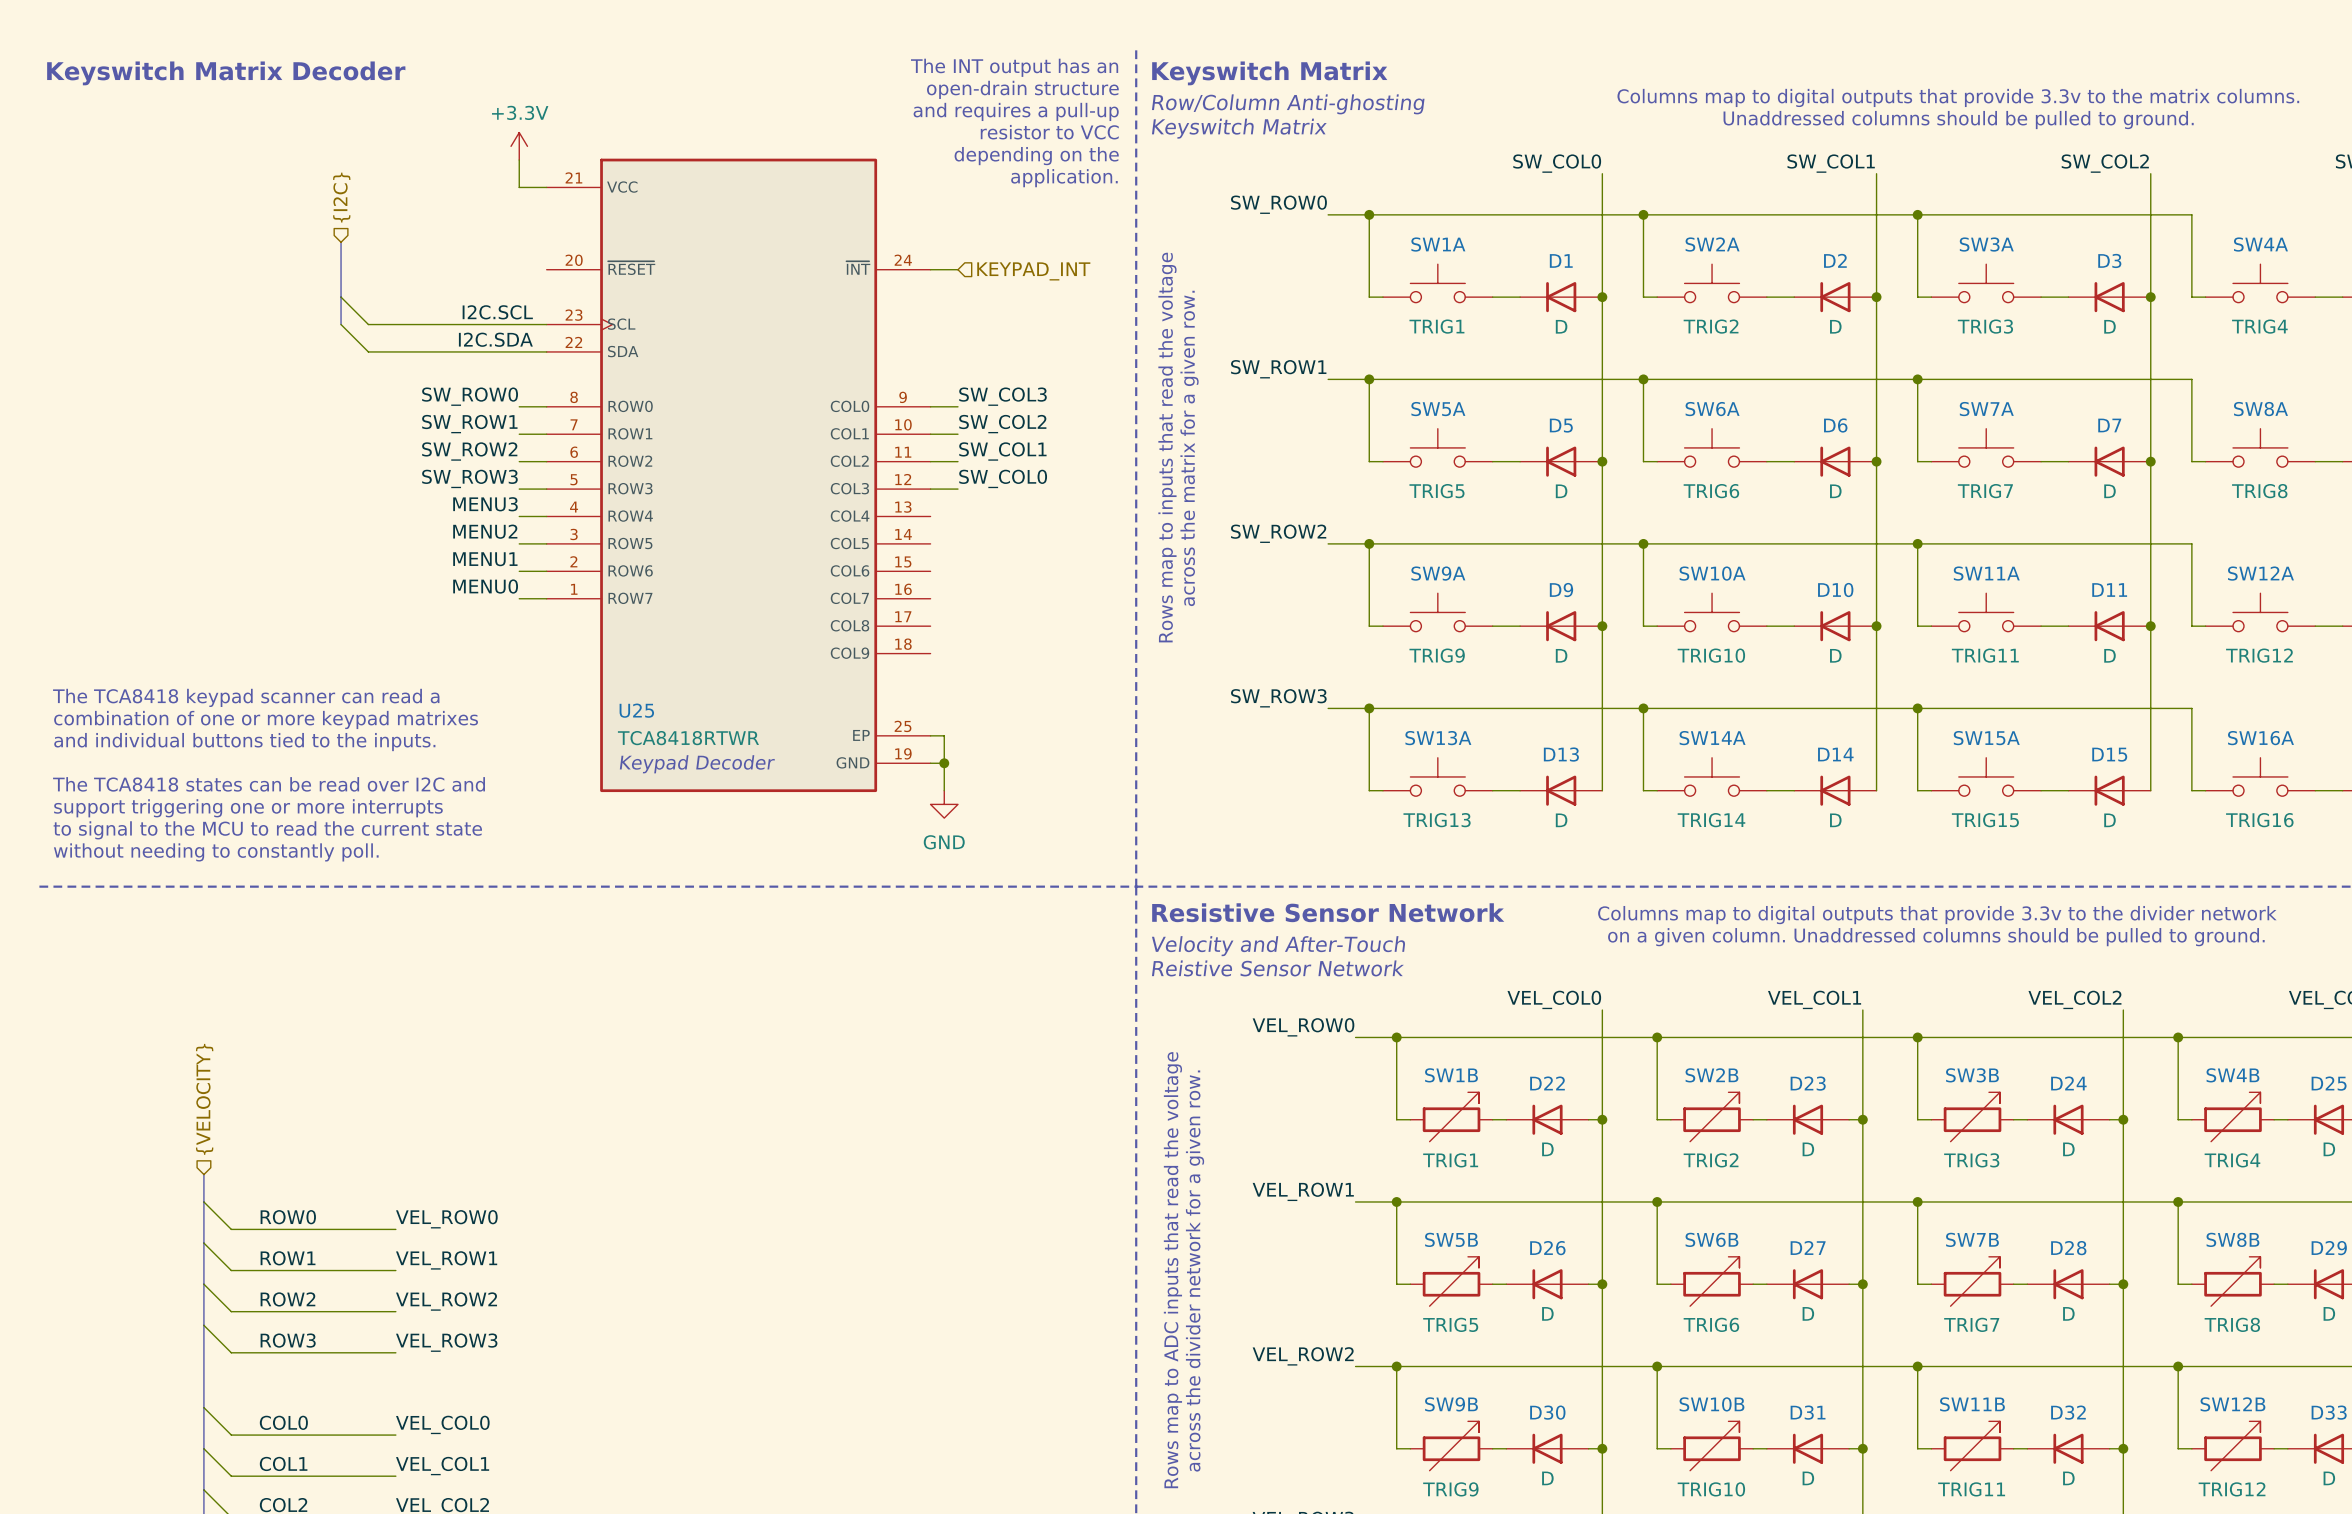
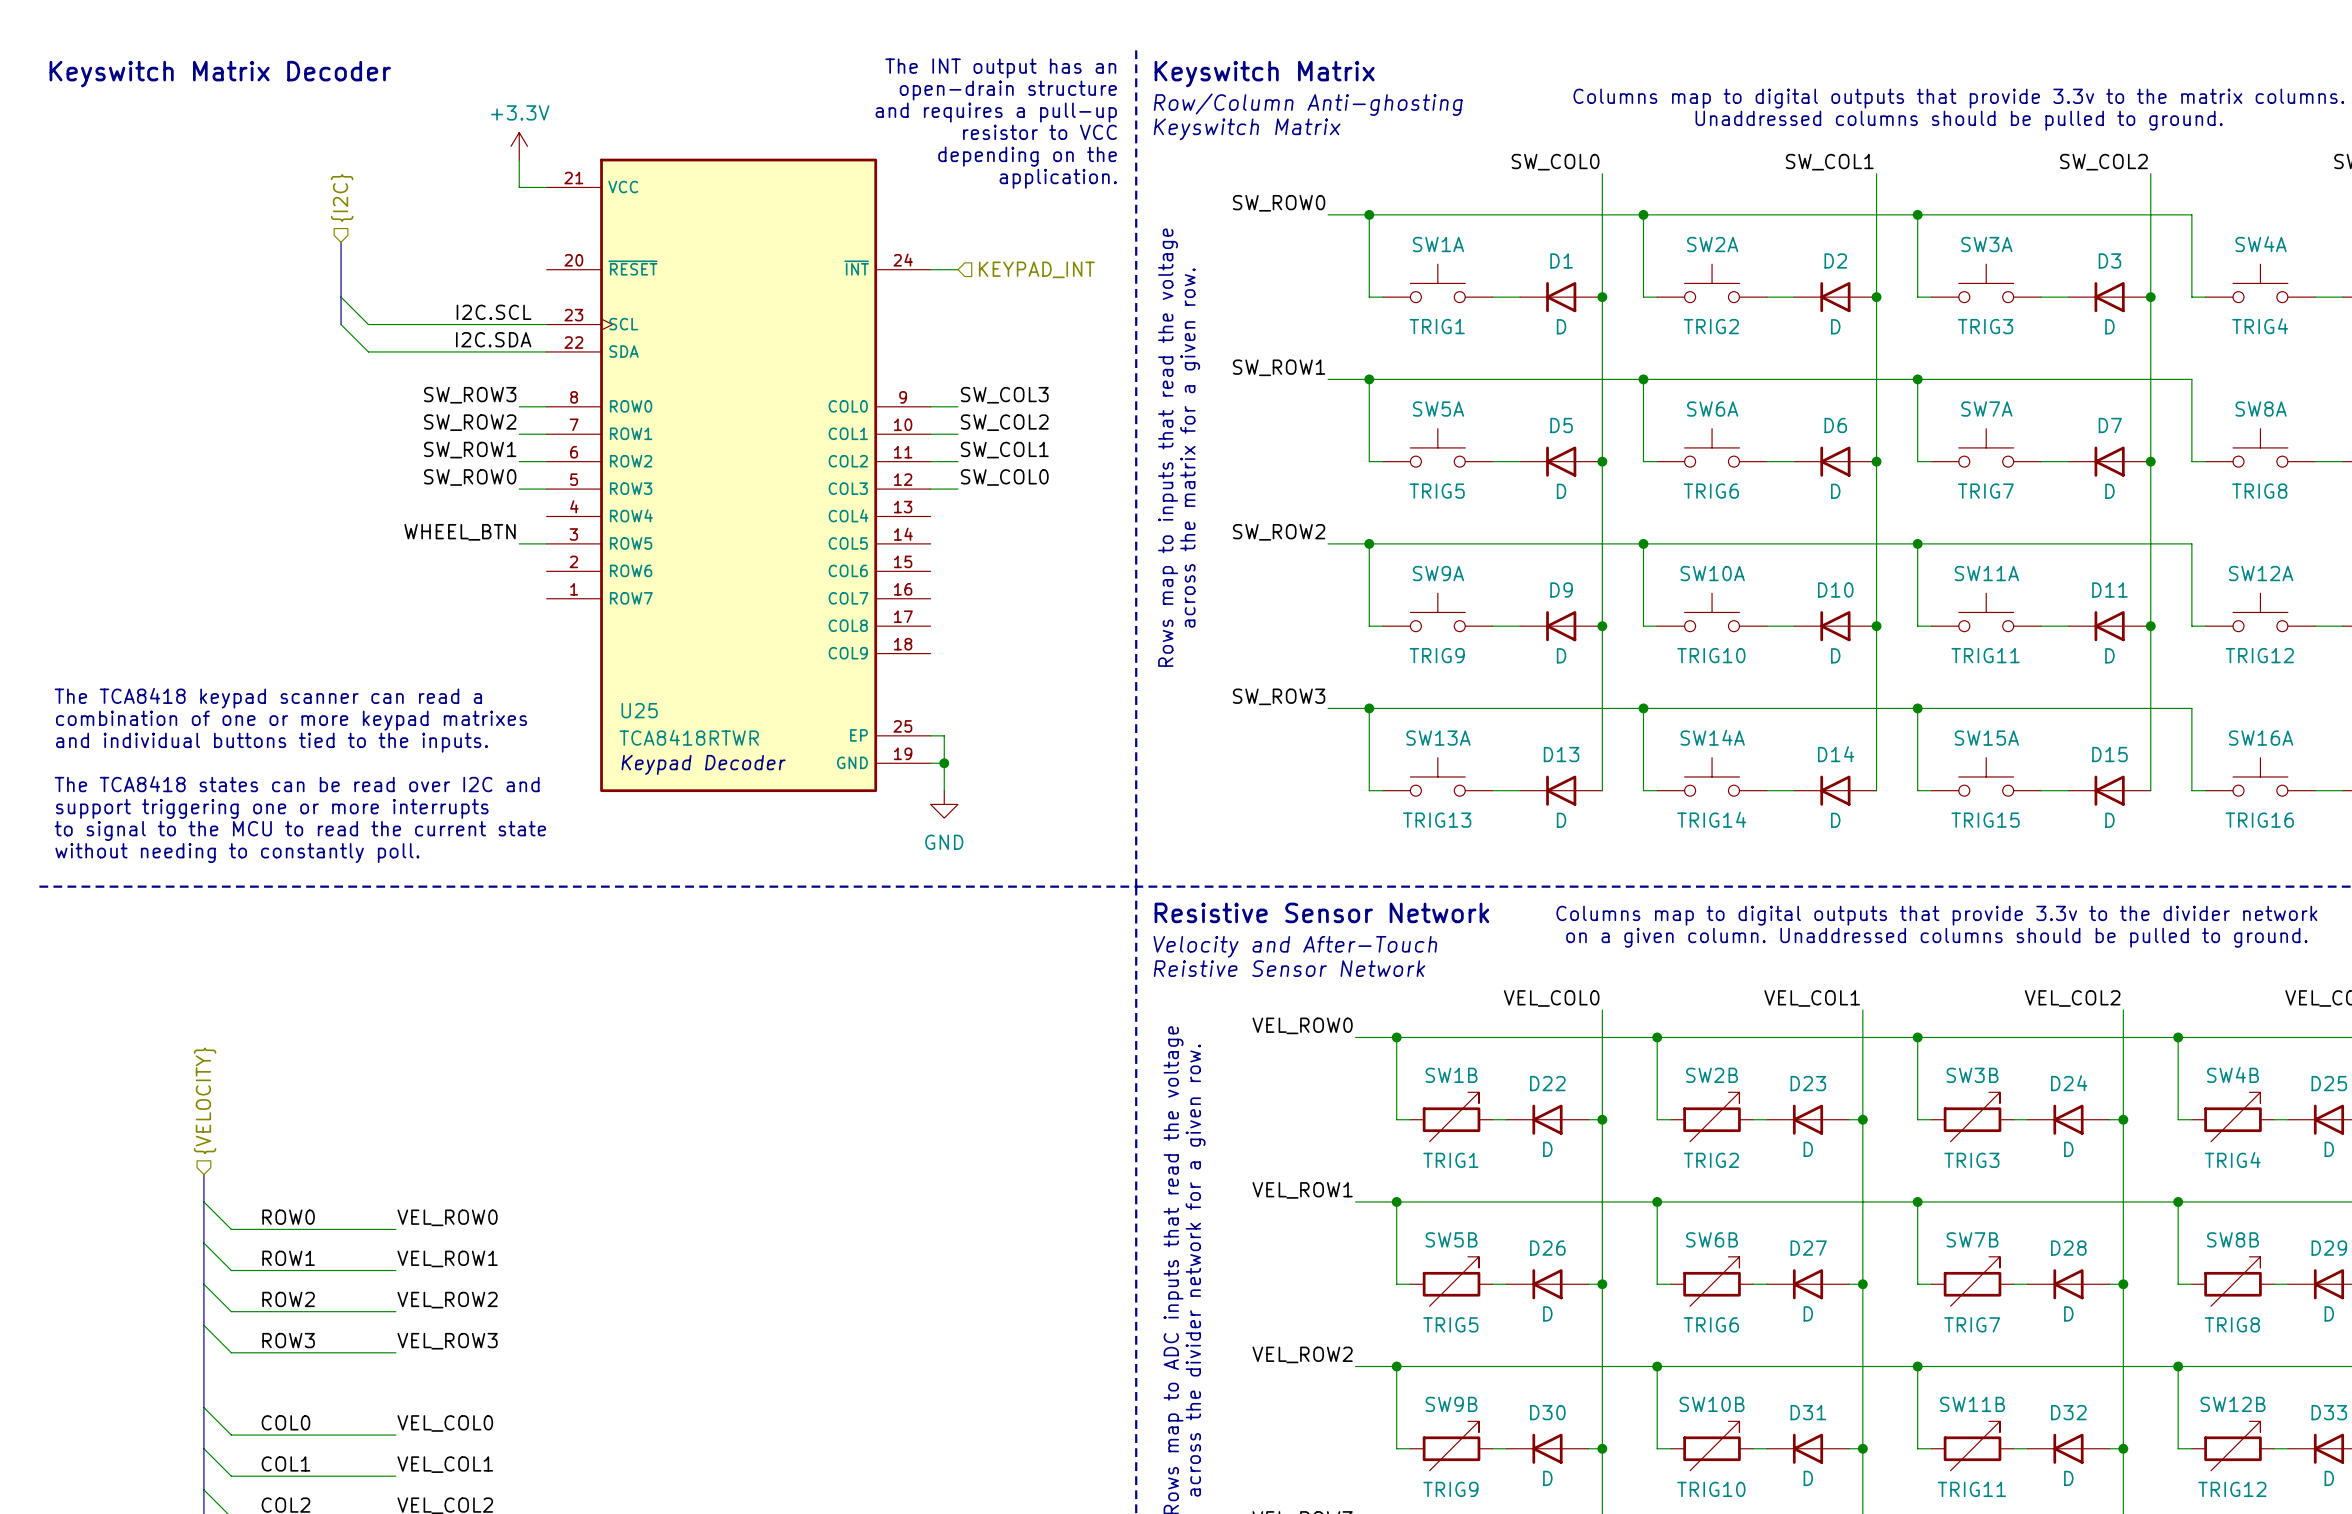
label: SW_ROW0 (470, 396) -> SW_ROW3 (470, 395)
label: SW_ROW1 (469, 424) -> SW_ROW2 (470, 422)
label: SW_ROW2 (469, 451) -> SW_ROW1 (470, 450)
label: SW_ROW3 (469, 478) -> SW_ROW0 (470, 477)
label: MENU3 (485, 504) -> none
wire: (519, 516) (546, 516) -> none
label: MENU2 (485, 531) -> WHEEL_BTN (460, 532)
label: MENU1 (485, 559) -> none
wire: (519, 571) (546, 571) -> none
label: MENU0 (485, 586) -> none
wire: (519, 598) (546, 598) -> none

